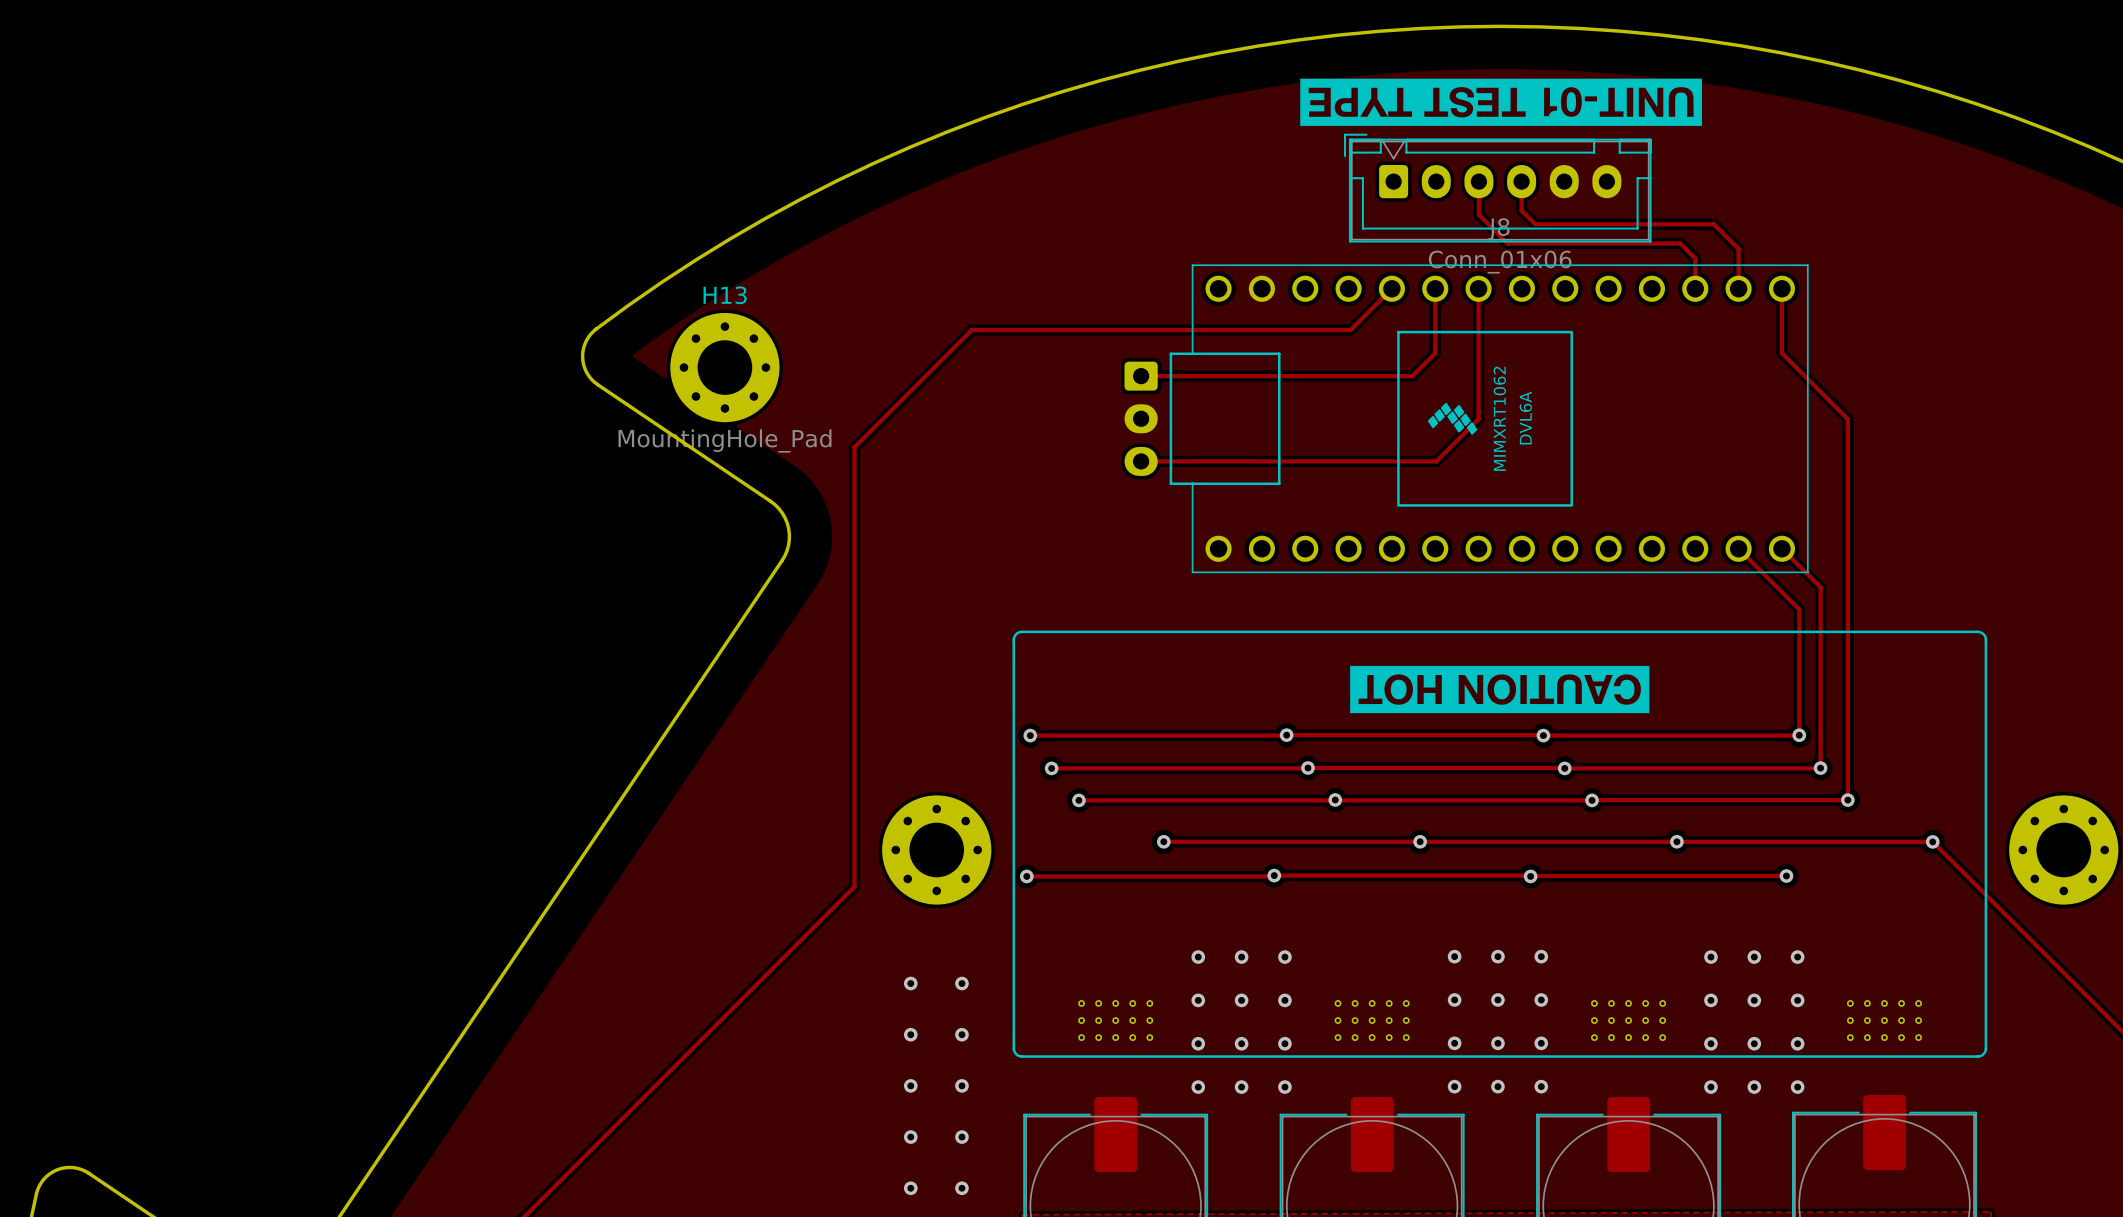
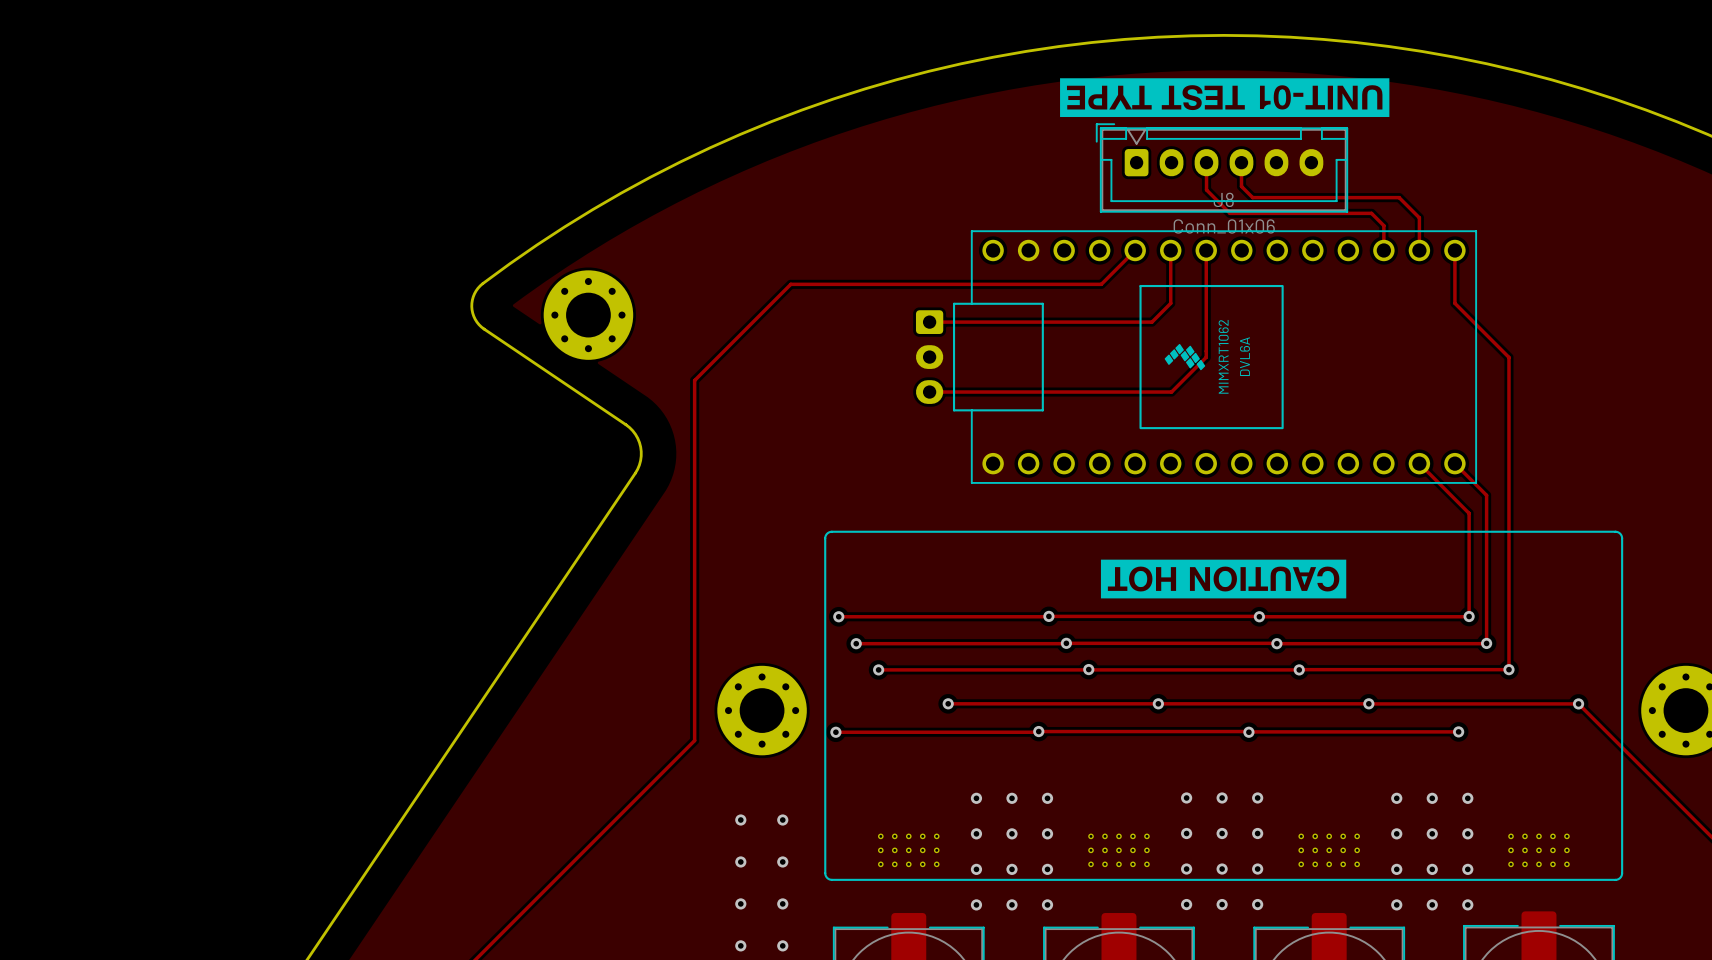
H13 name: H13 (725, 295) -> none
H13 value: MountingHole_Pad (725, 440) -> none

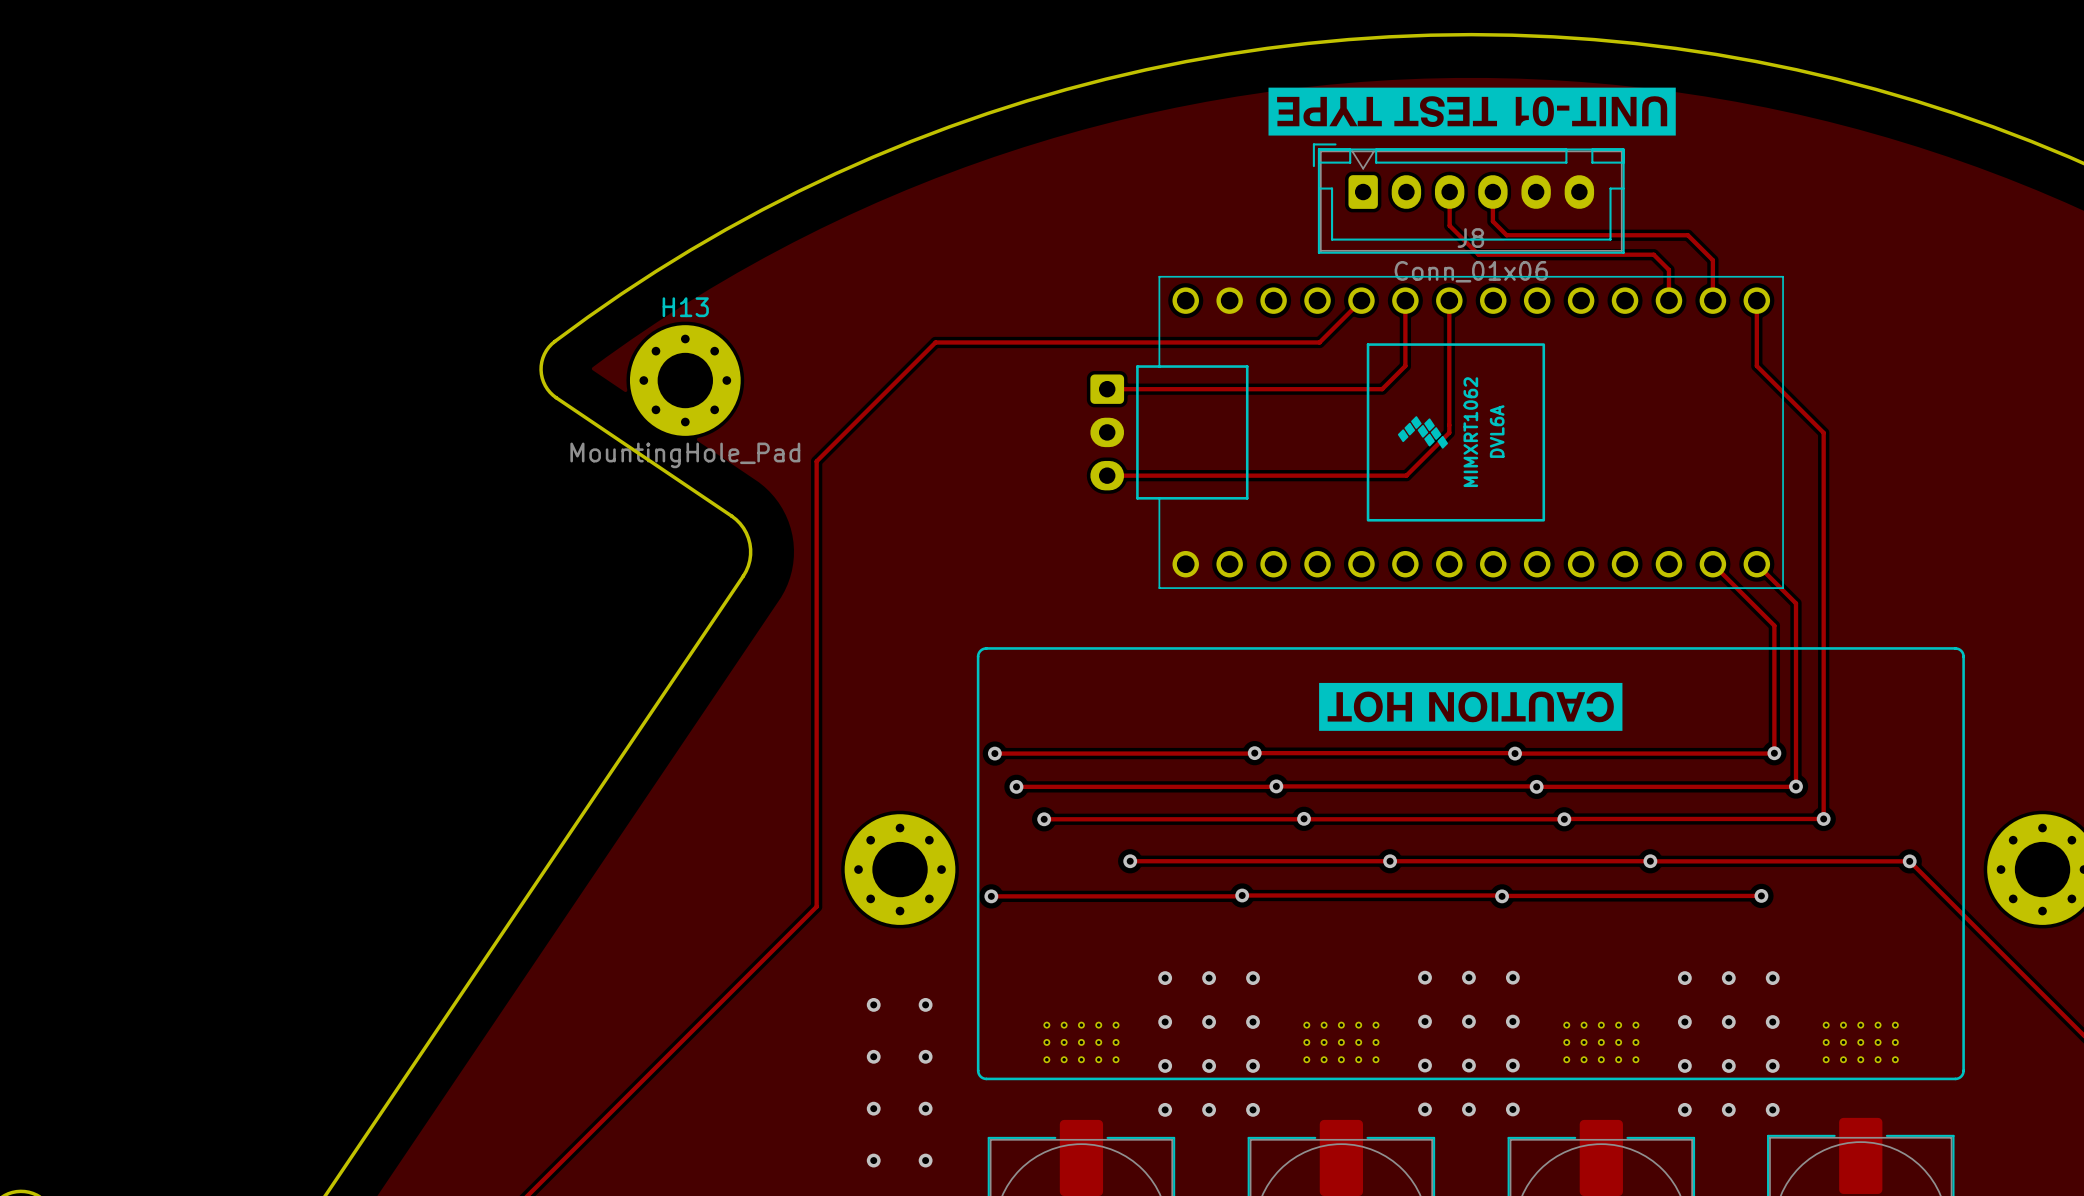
H13 name: none -> H13 (685, 307)
H13 value: none -> MountingHole_Pad (685, 455)

